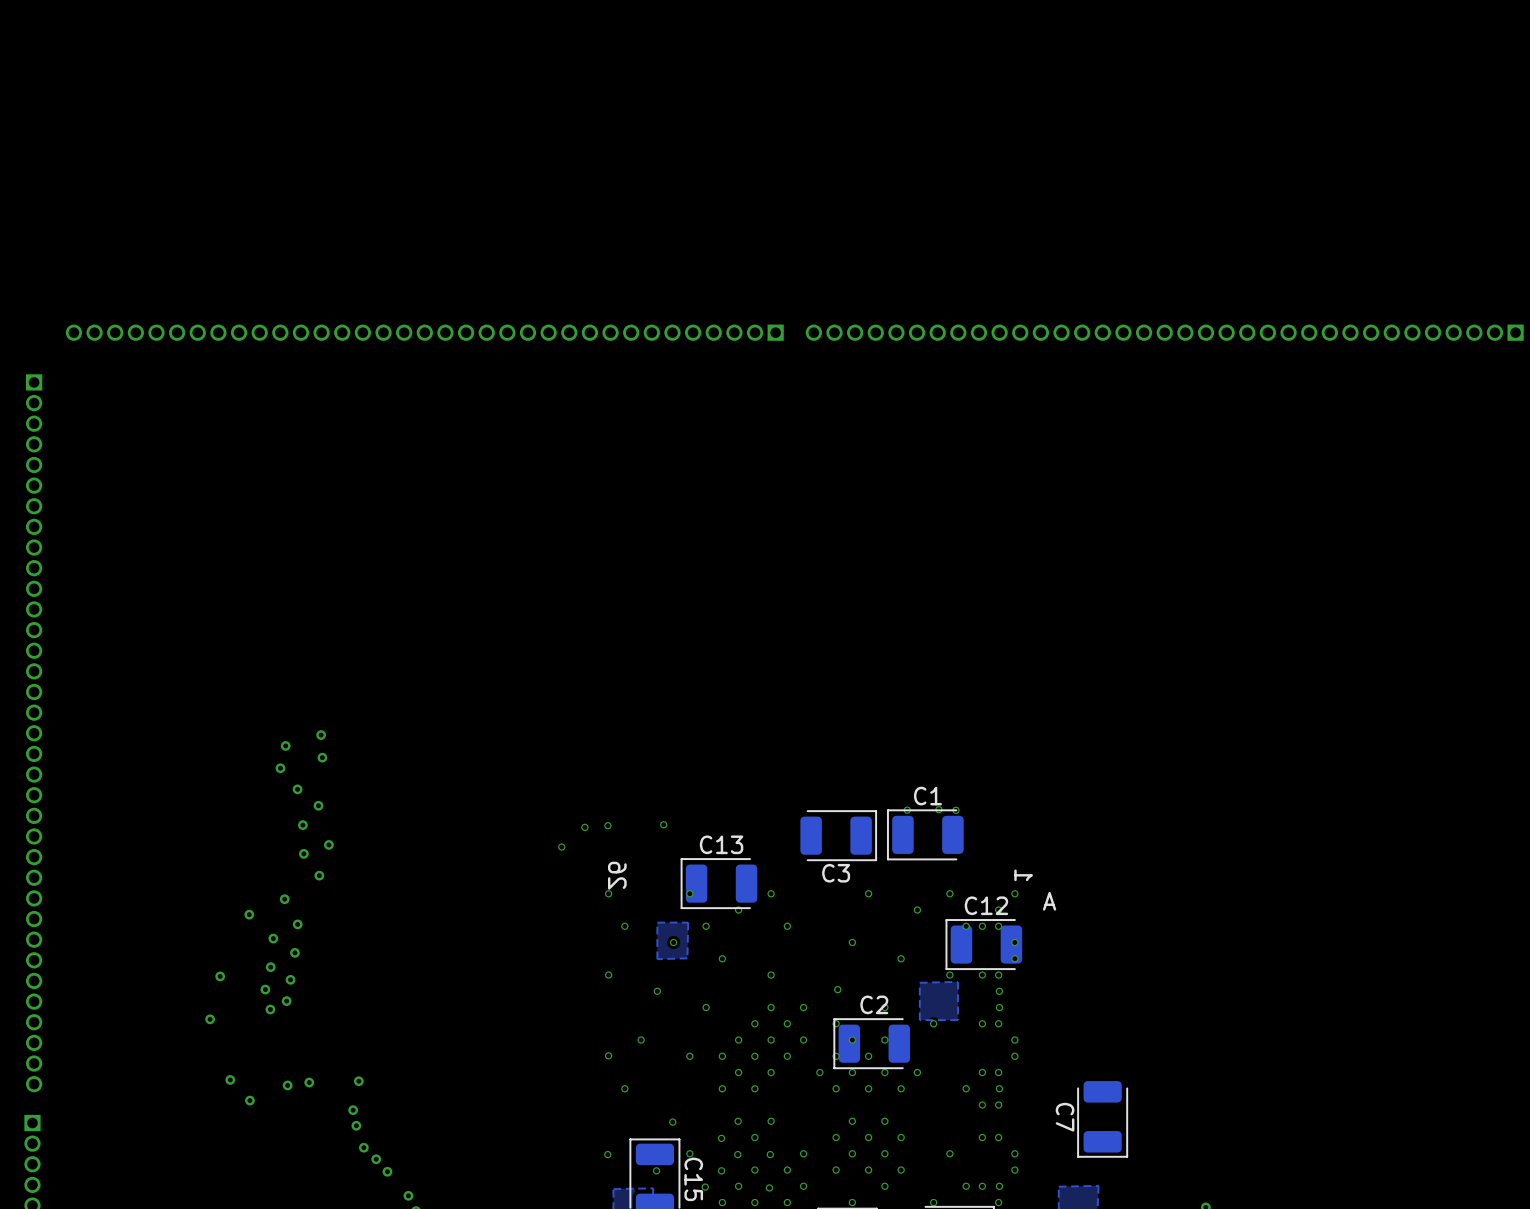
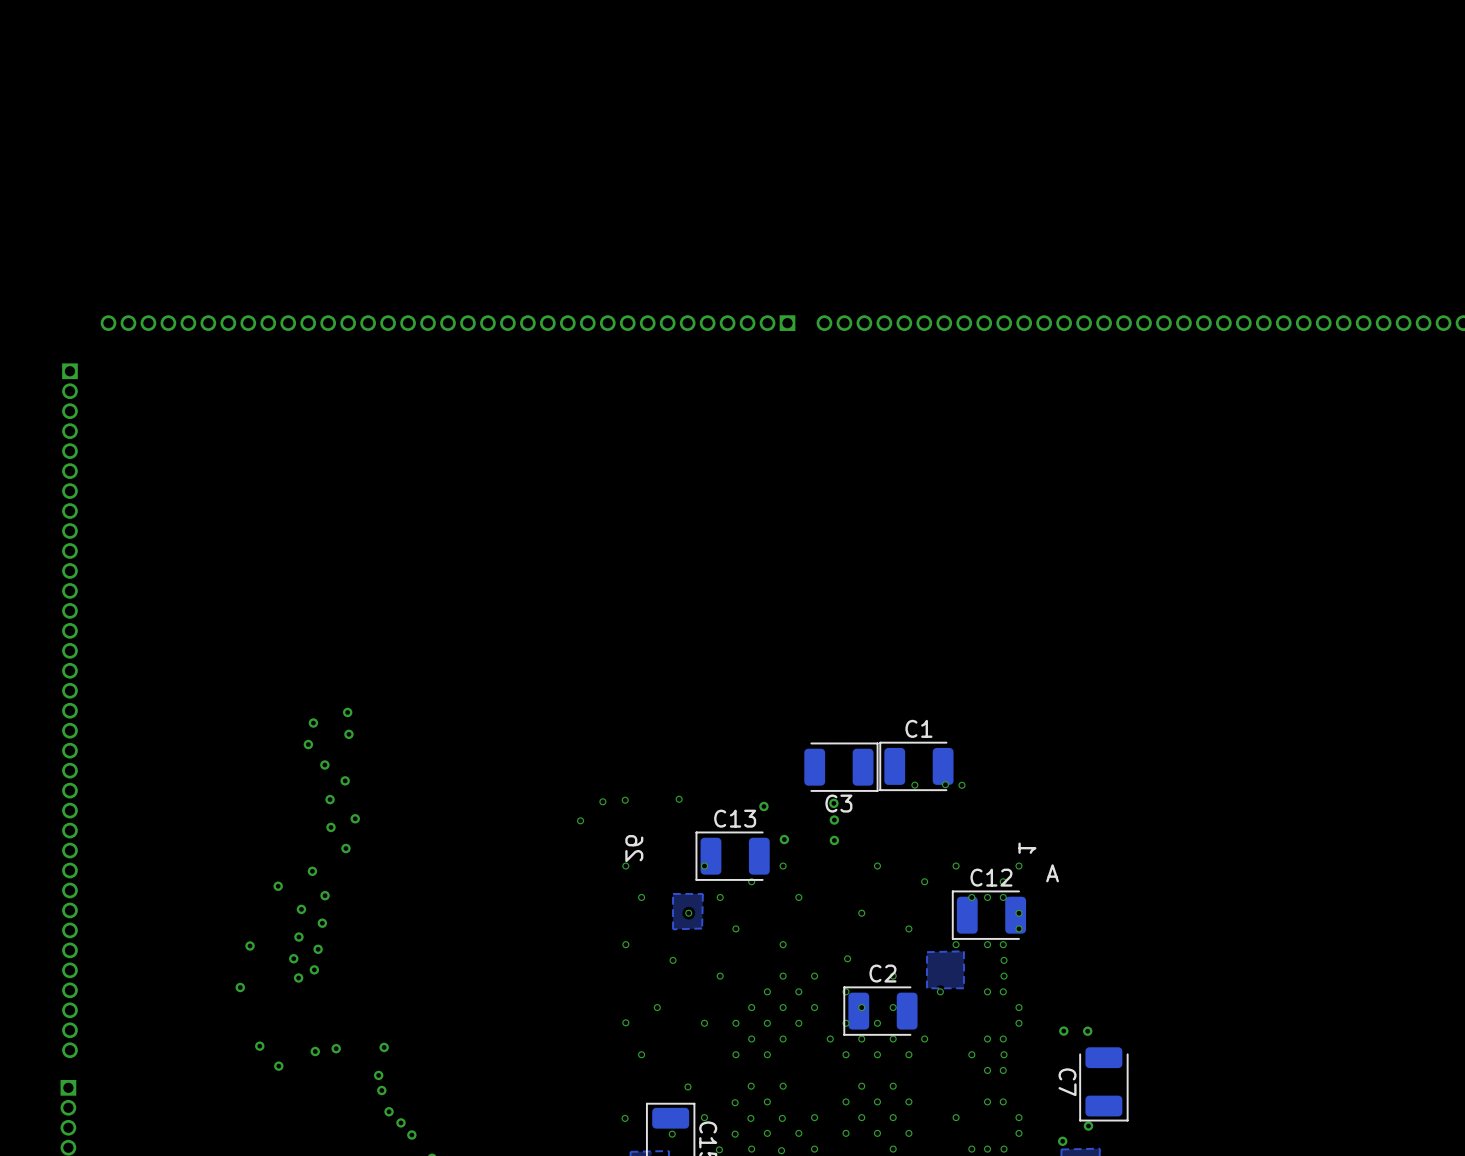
via: none -> (833, 803)
via: none -> (763, 806)
C1 position: (925, 834) -> (916, 766)
C3 position: (838, 835) -> (841, 767)
via: none -> (834, 820)
via: none -> (784, 839)
via: none -> (834, 840)
via: none -> (1063, 1031)
via: none -> (1087, 1031)
via: none -> (1088, 1126)
via: none -> (1062, 1141)

